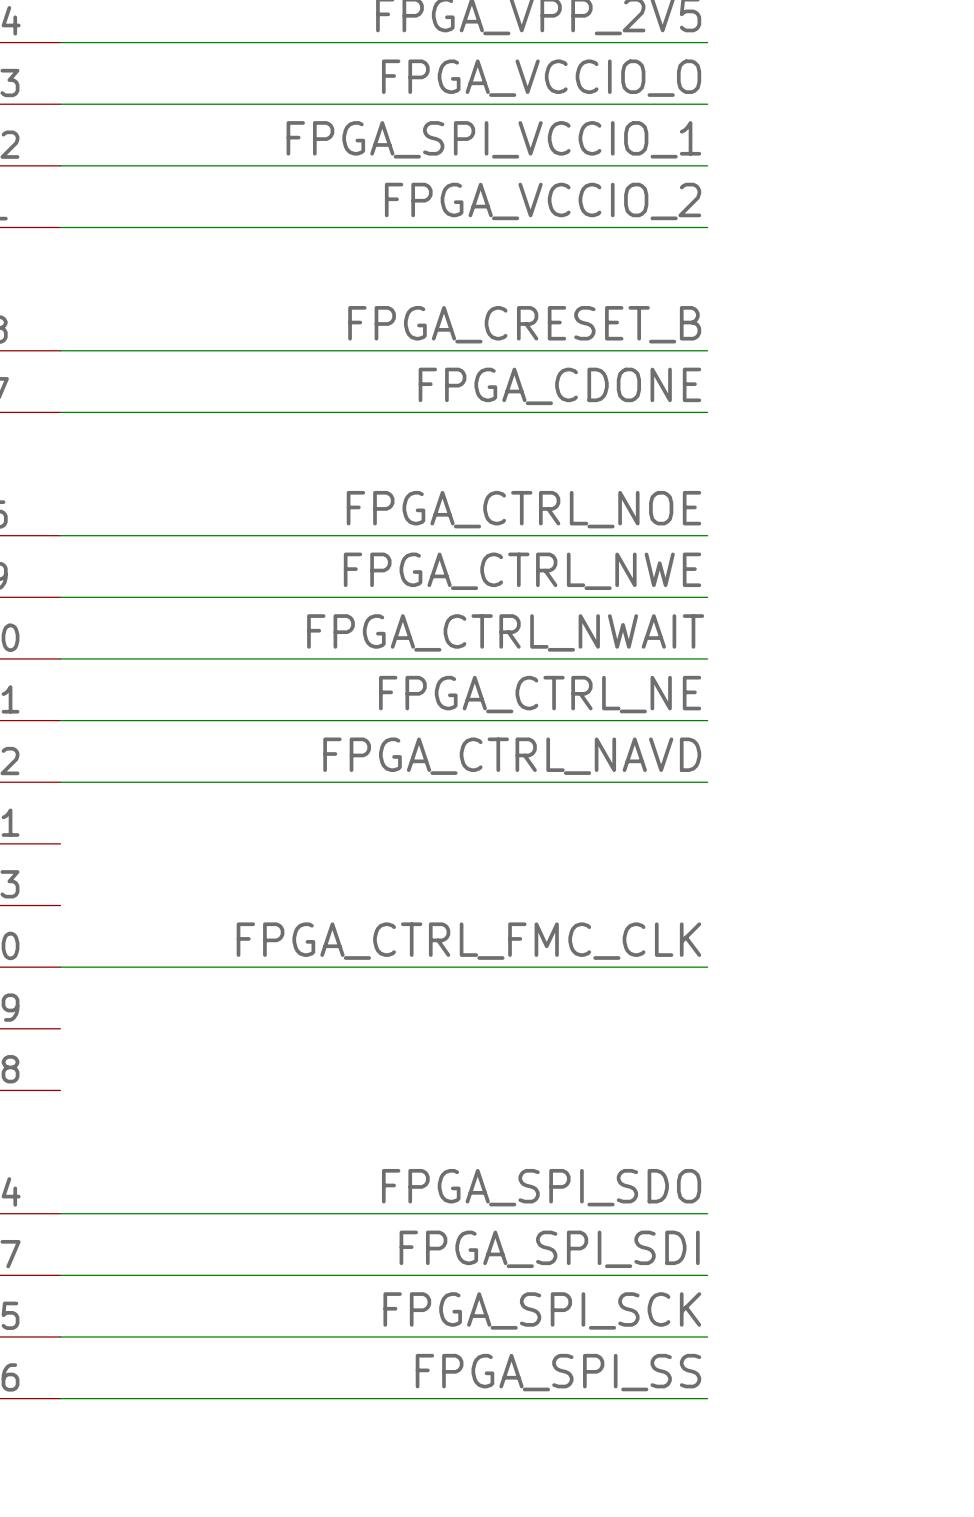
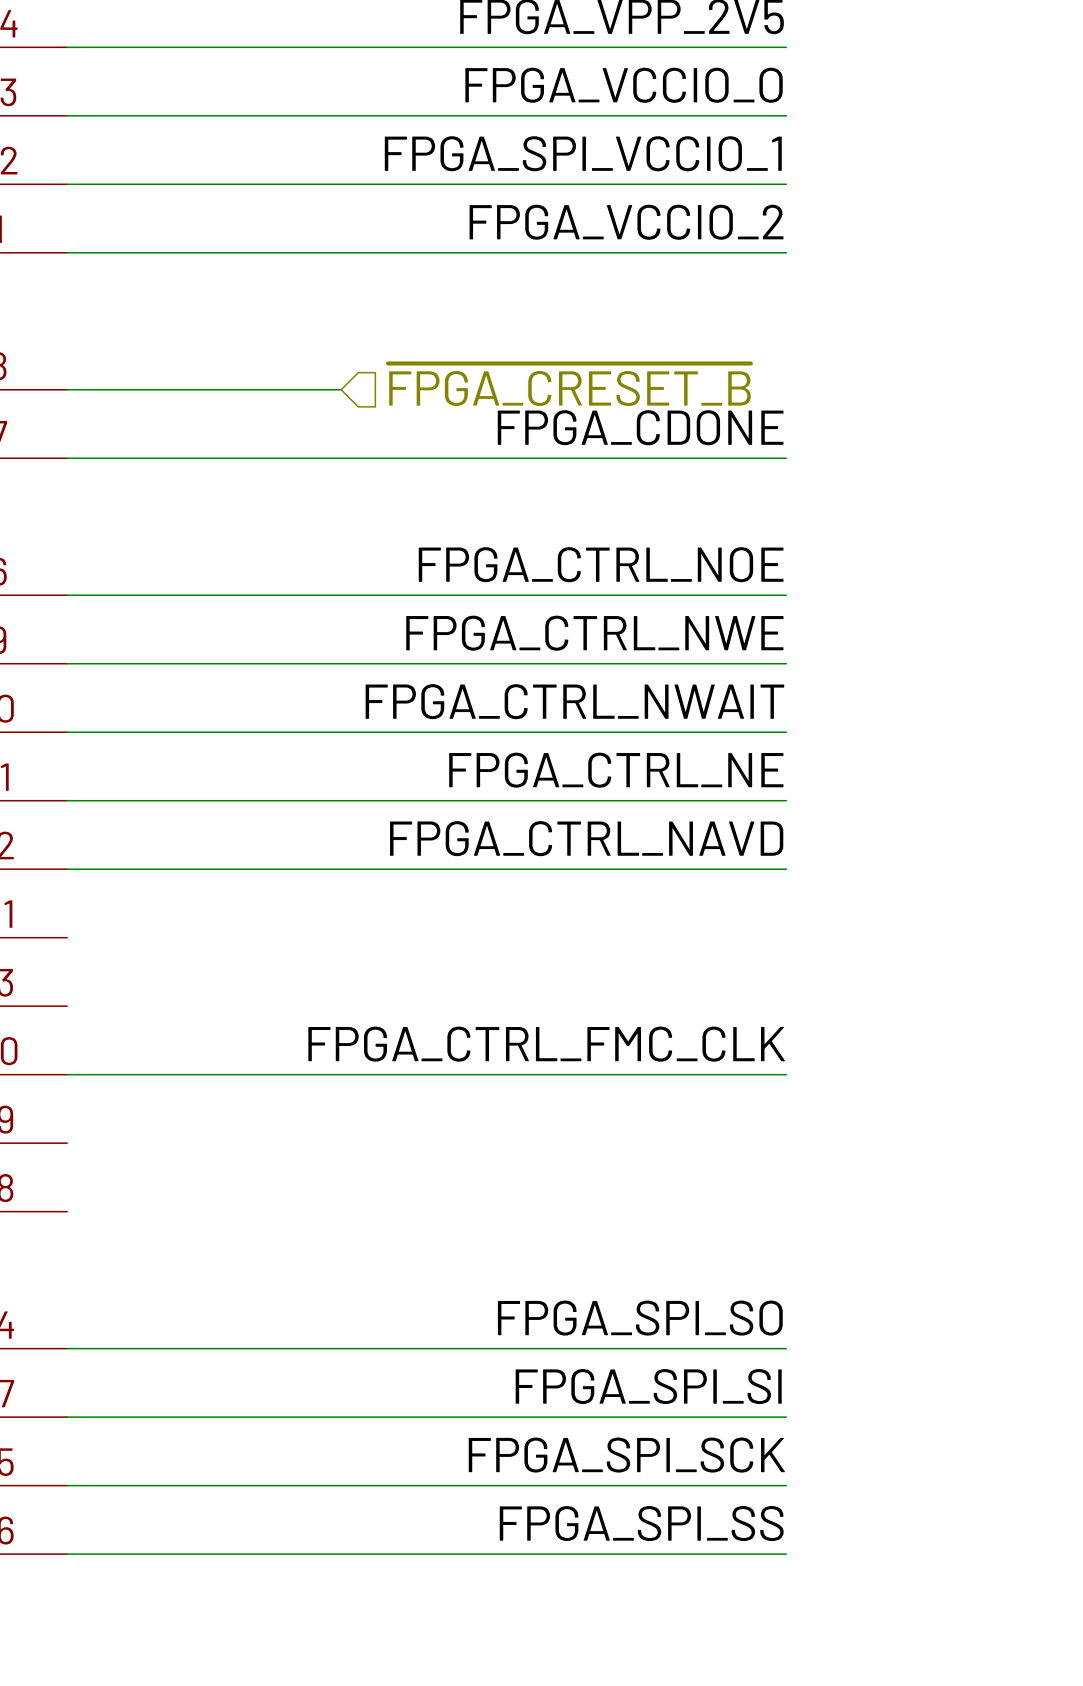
label: FPGA_CRESET_B (524, 324) -> none
hierarchical label: none -> ~{FPGA_CRESET_B} (569, 384)
wire: (306, 350) (707, 350) -> none
label: FPGA_SPI_SDO (541, 1187) -> FPGA_SPI_SO (640, 1318)
label: FPGA_SPI_SDI (549, 1249) -> FPGA_SPI_SI (648, 1386)

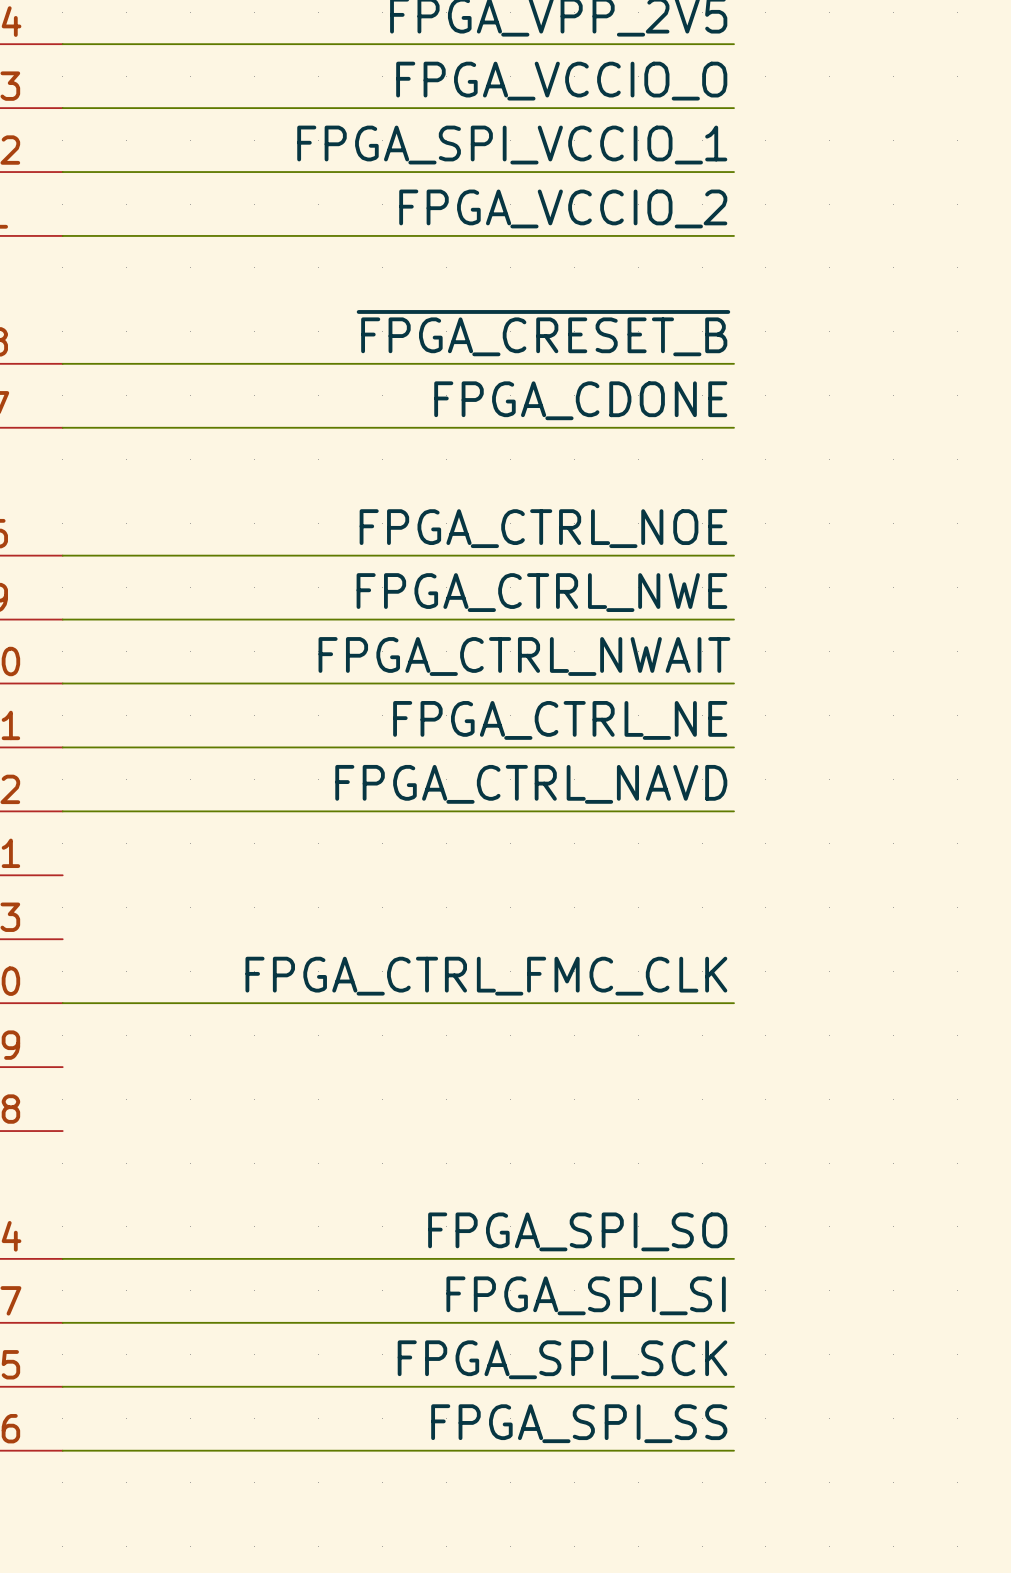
label: none -> ~{FPGA_CRESET_B} (543, 333)
hierarchical label: ~{FPGA_CRESET_B} (569, 384) -> none
wire: none -> (318, 363) (733, 363)

